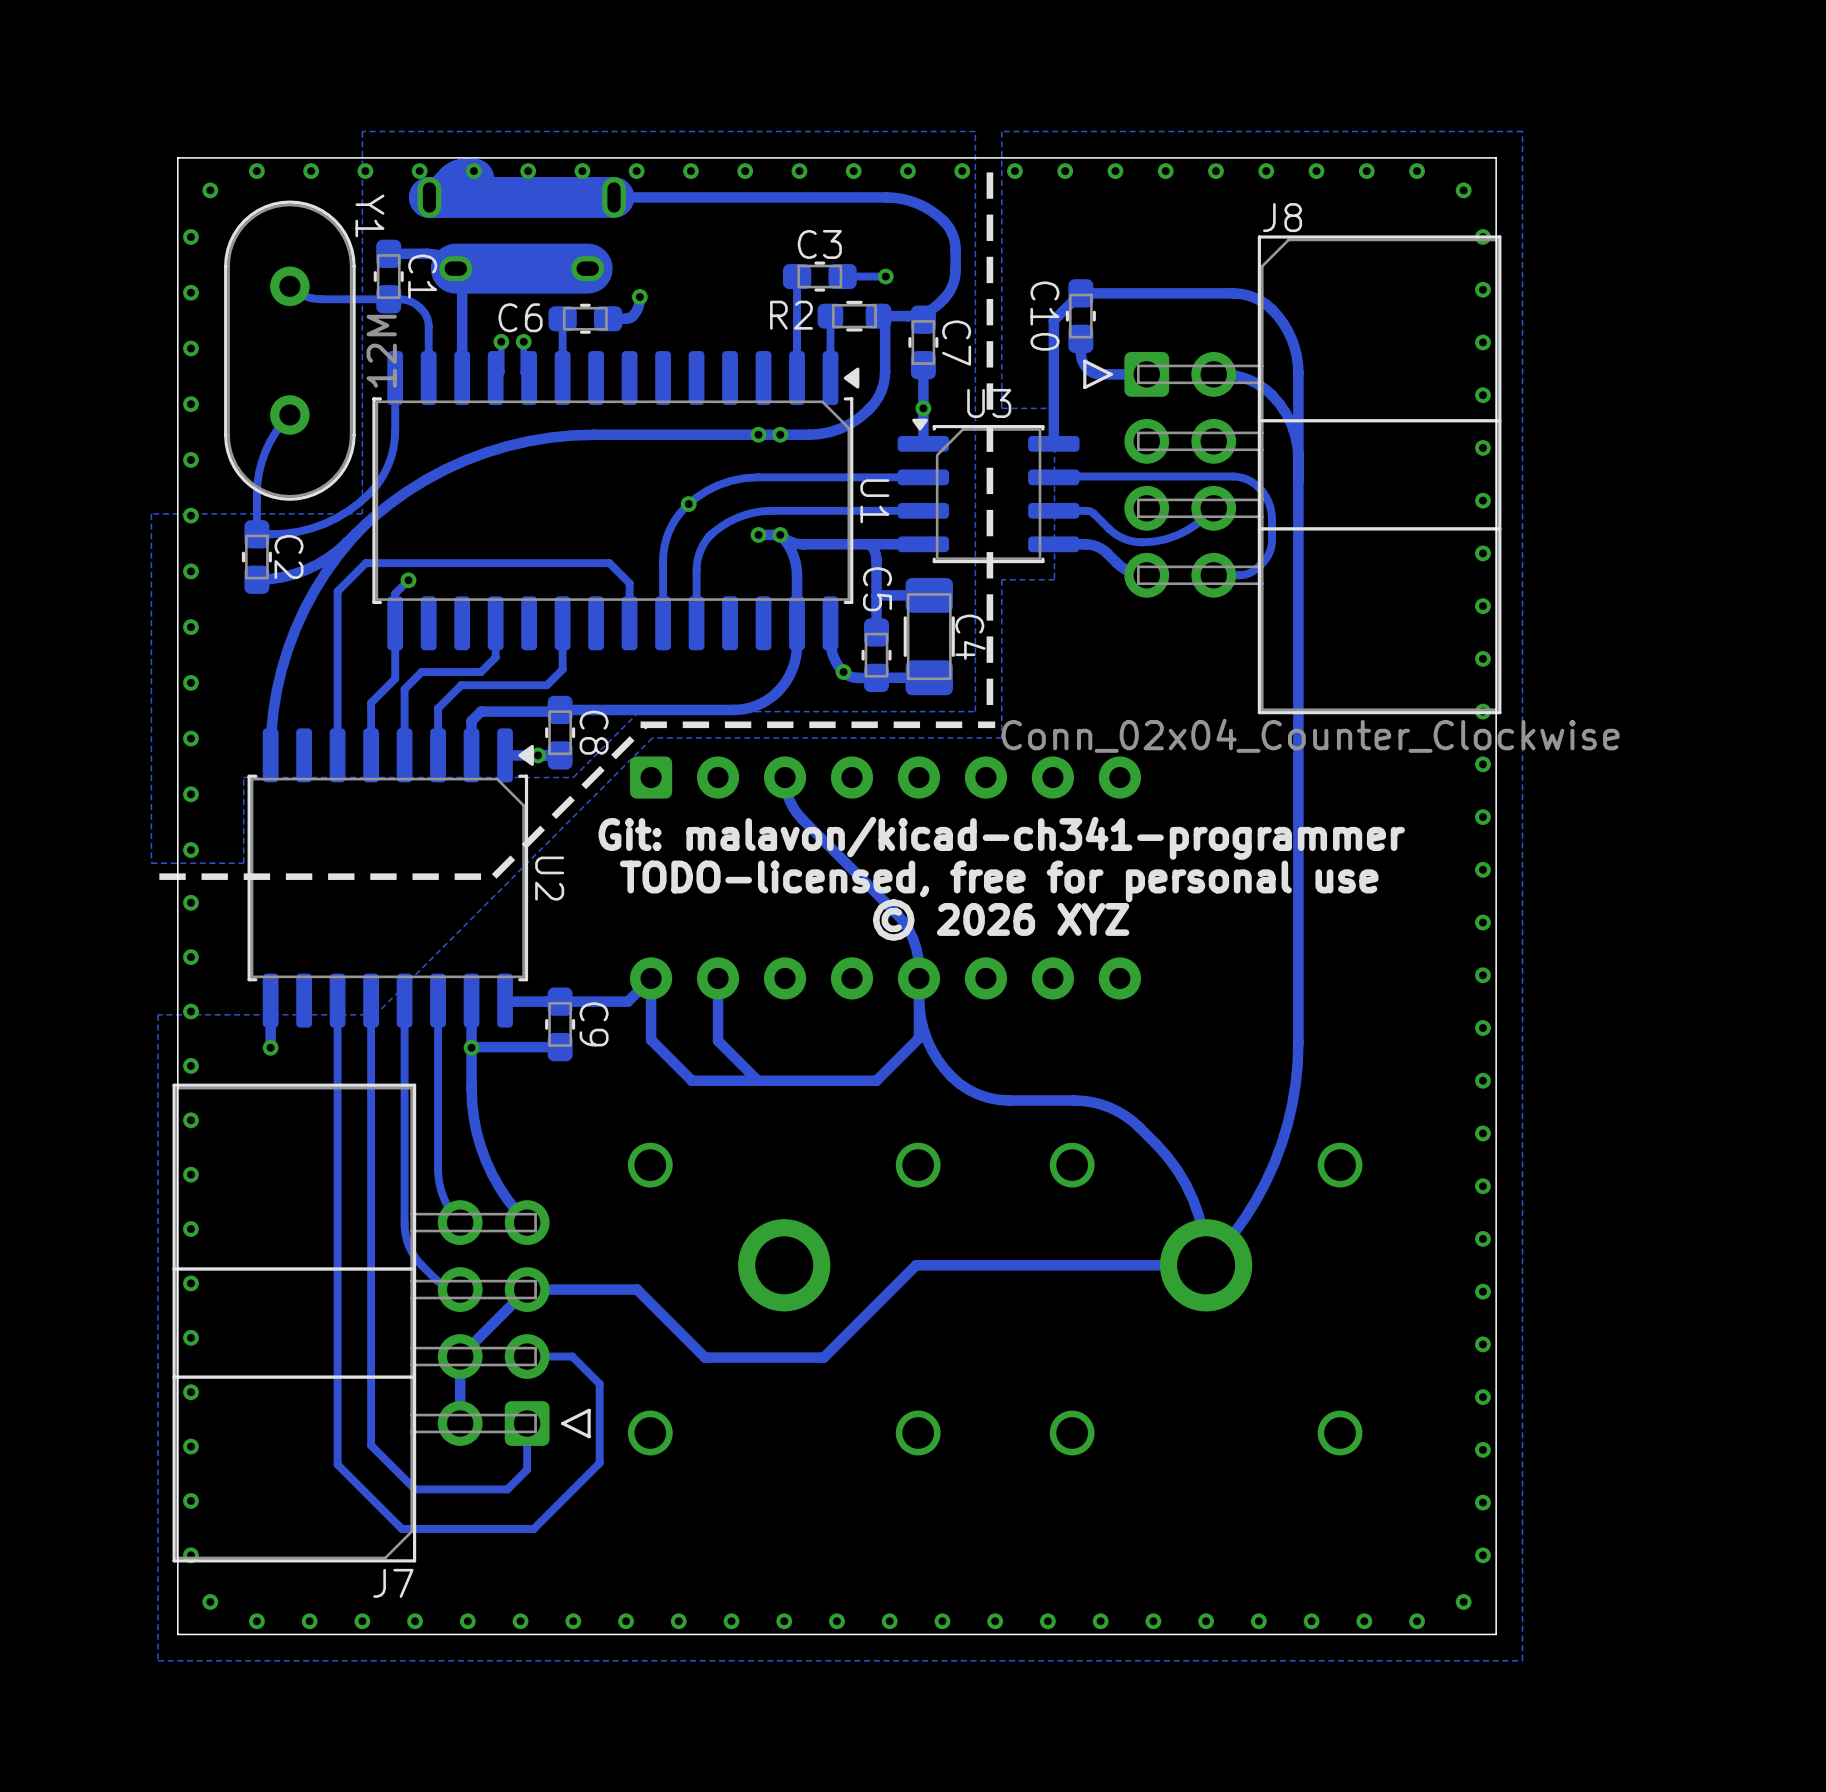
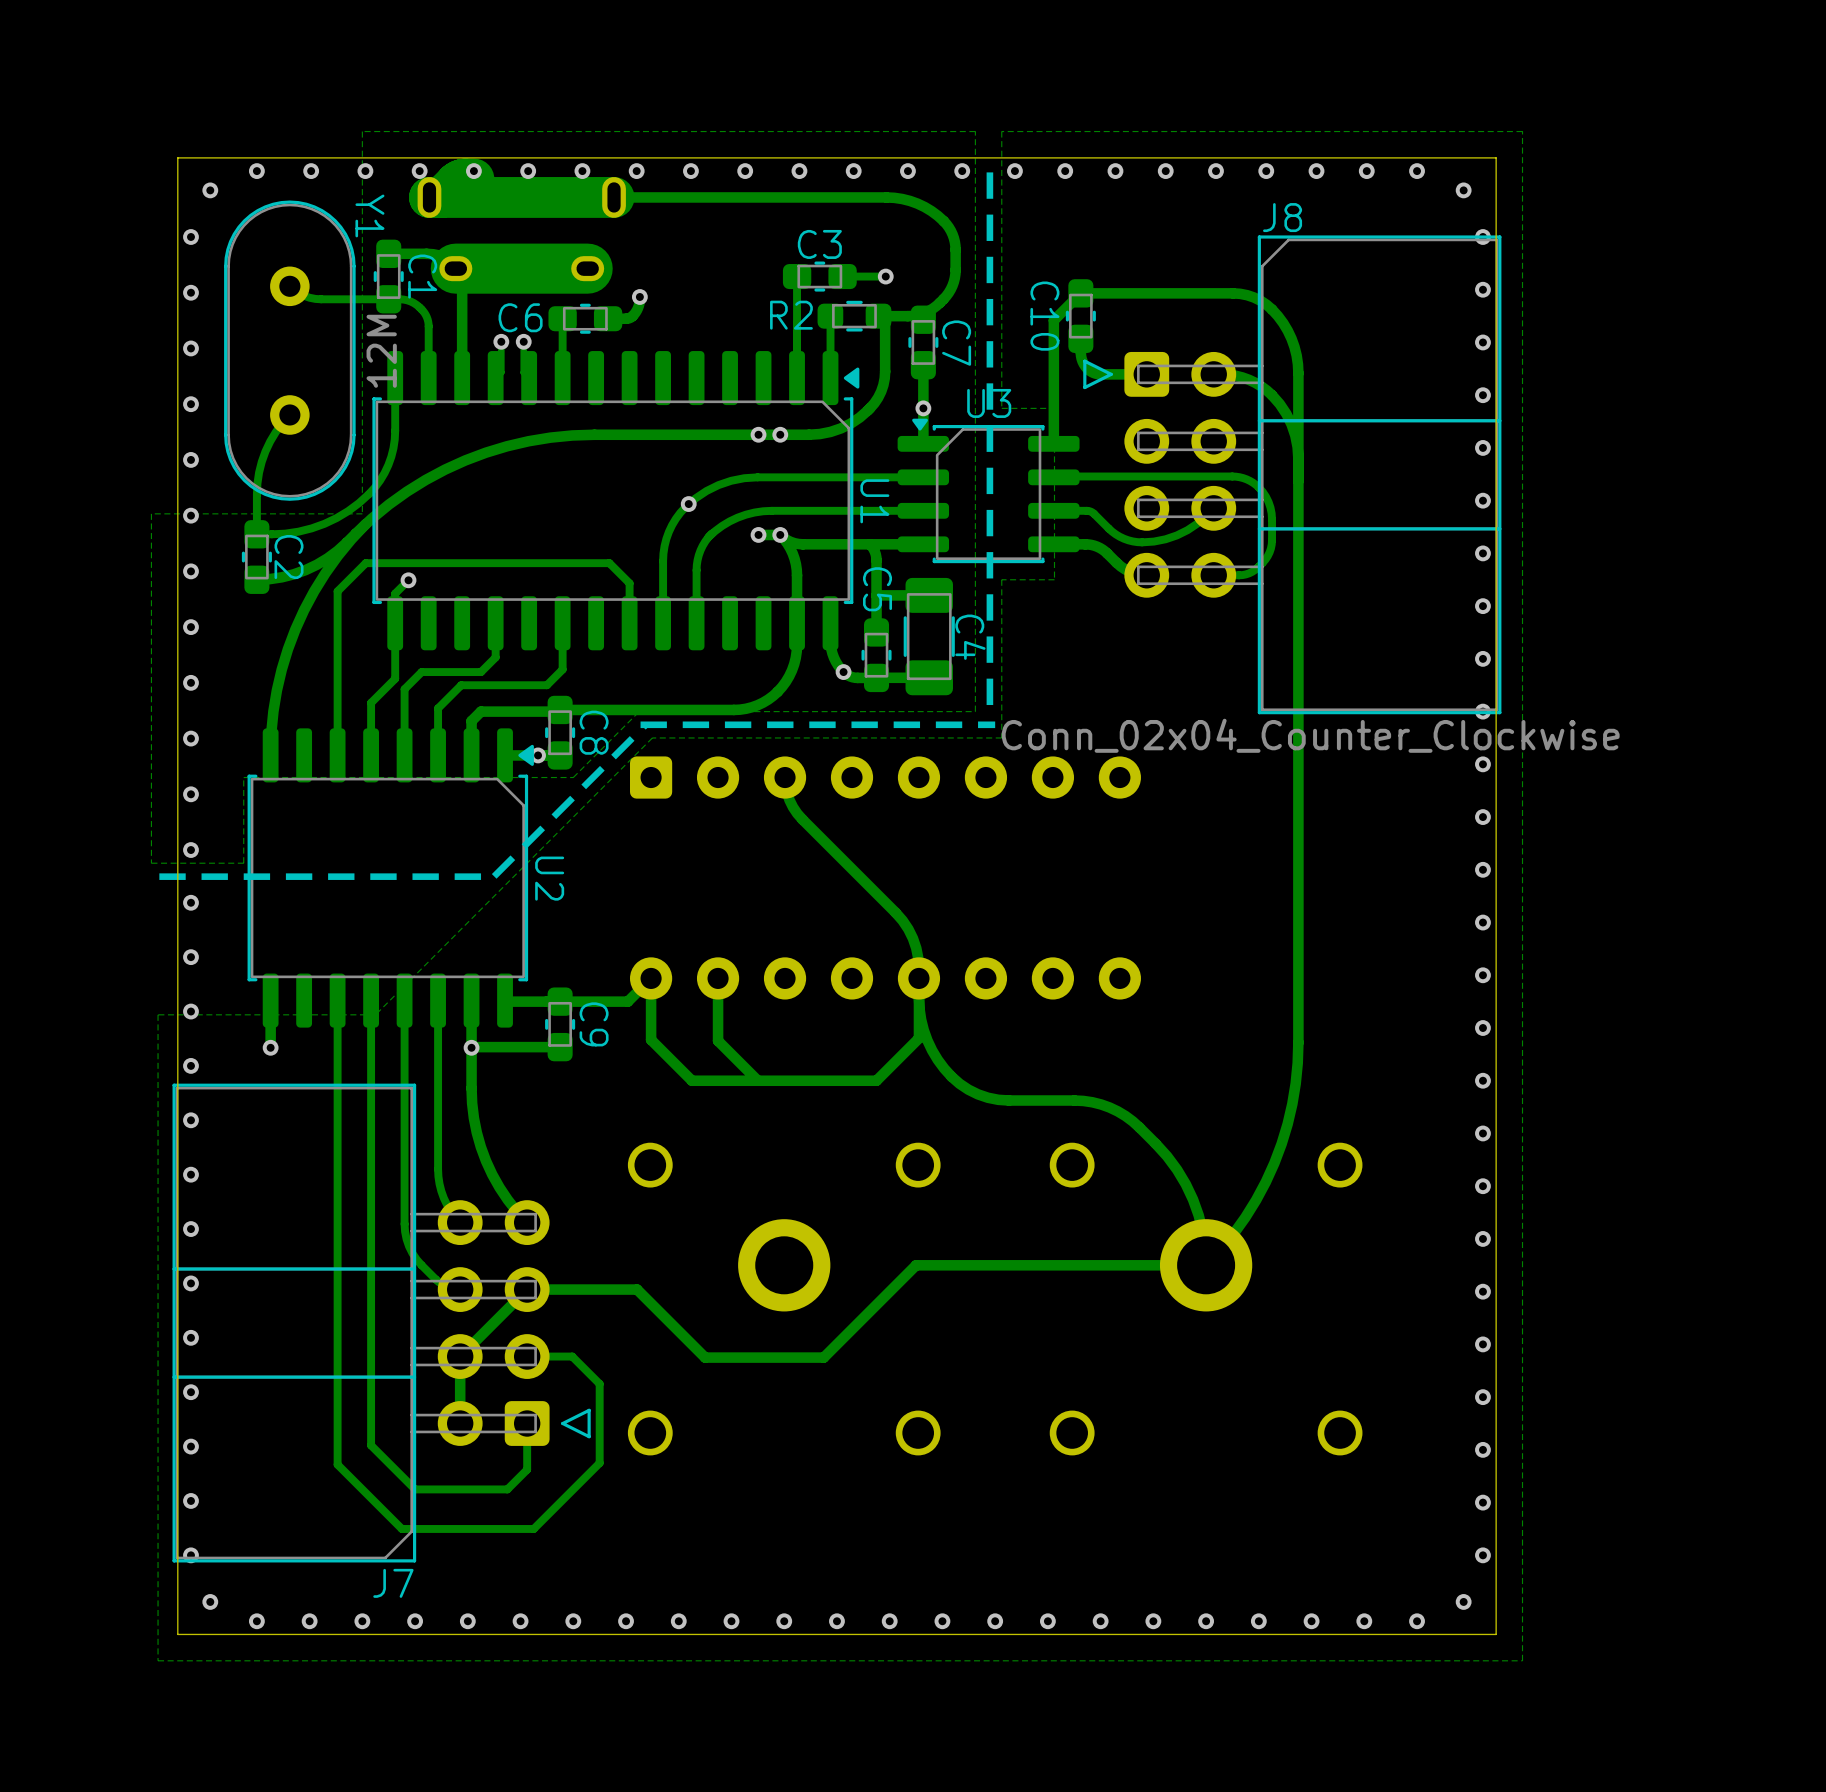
text: Git: malavon/kicad-ch341-programmer (1001, 838) -> none
text: TODO-licensed, free for personal use (999, 881) -> none
text: © 2026 XYZ (1001, 920) -> none

